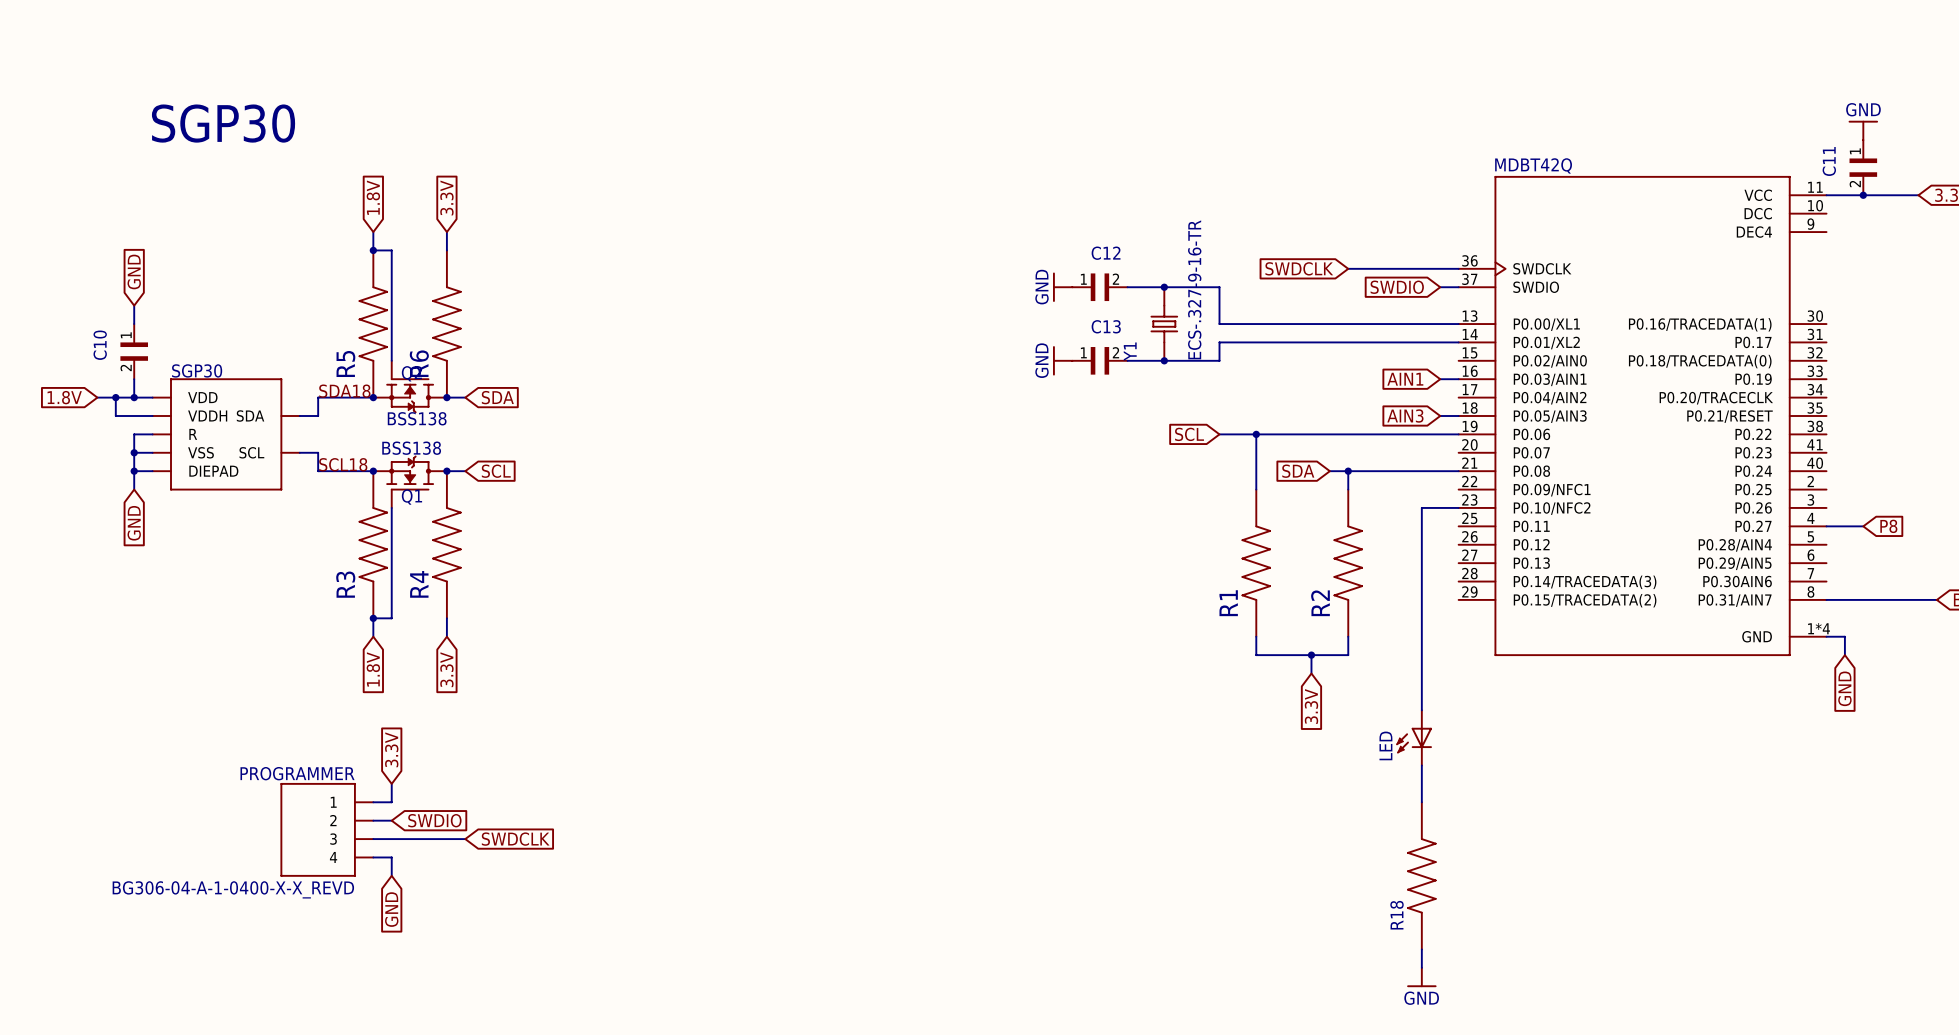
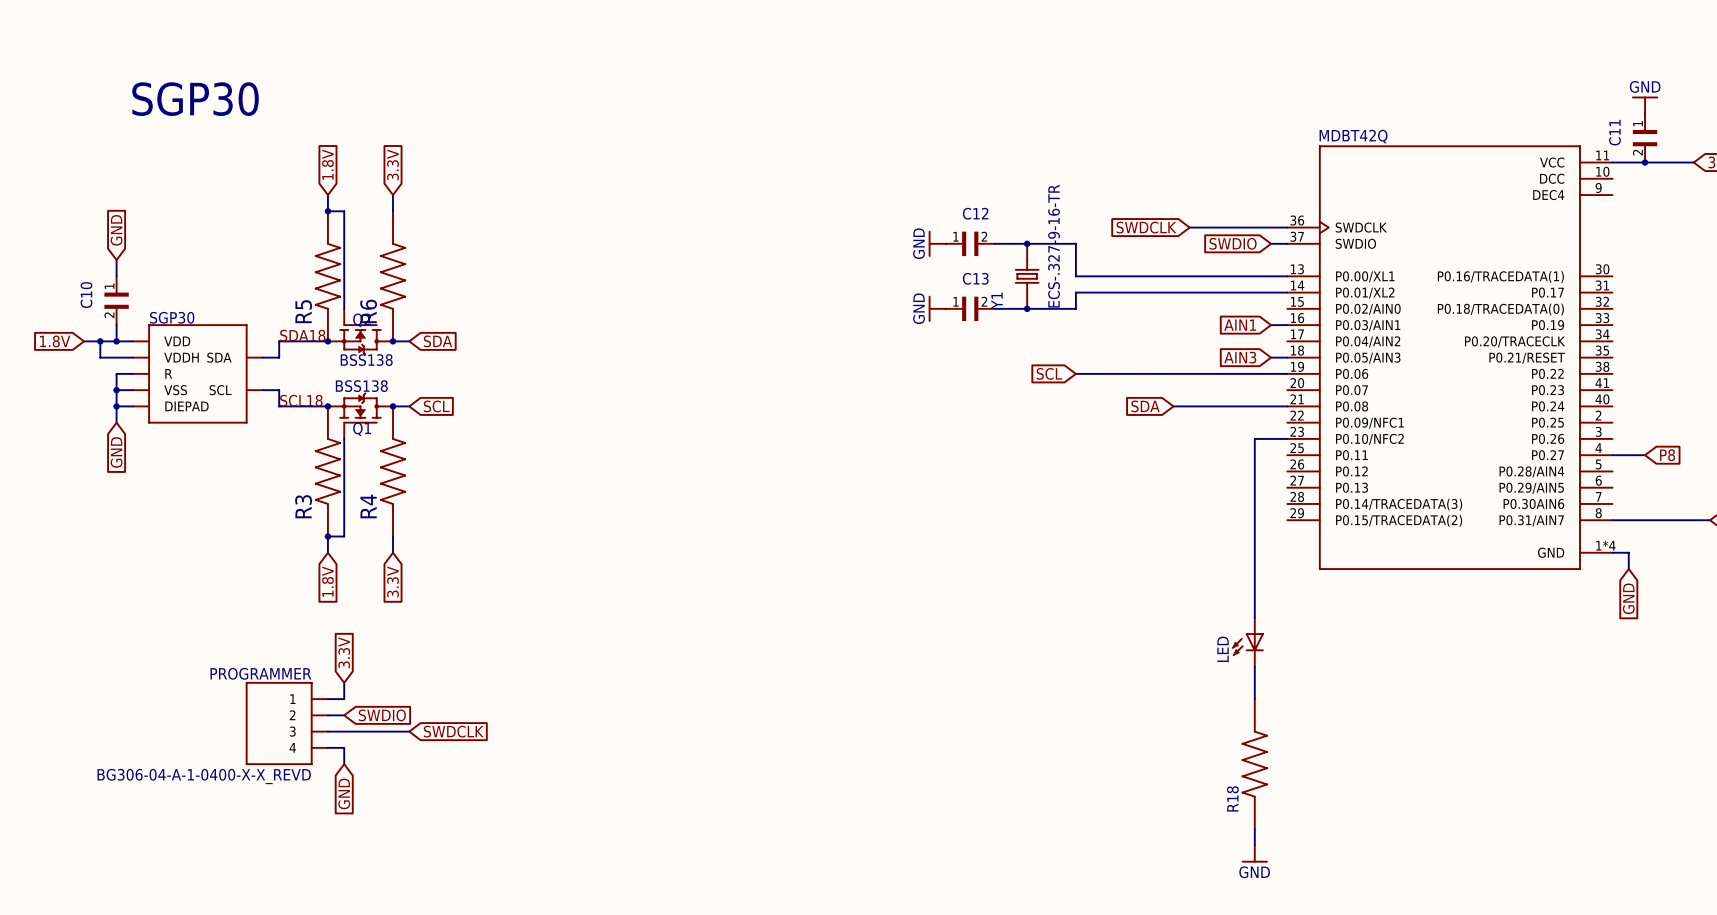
wire: (1256, 434) (1256, 489) -> none
junction: (1256, 434) -> none
wire: (1348, 471) (1348, 489) -> none
junction: (1348, 471) -> none
R1: (1256, 563) -> none
R2: (1348, 563) -> none
wire: (1256, 636) (1256, 655) (1348, 655) (1348, 636) -> none
wire: (1311, 655) (1311, 673) -> none
junction: (1311, 655) -> none
global label: 3.3V (1311, 706) -> none

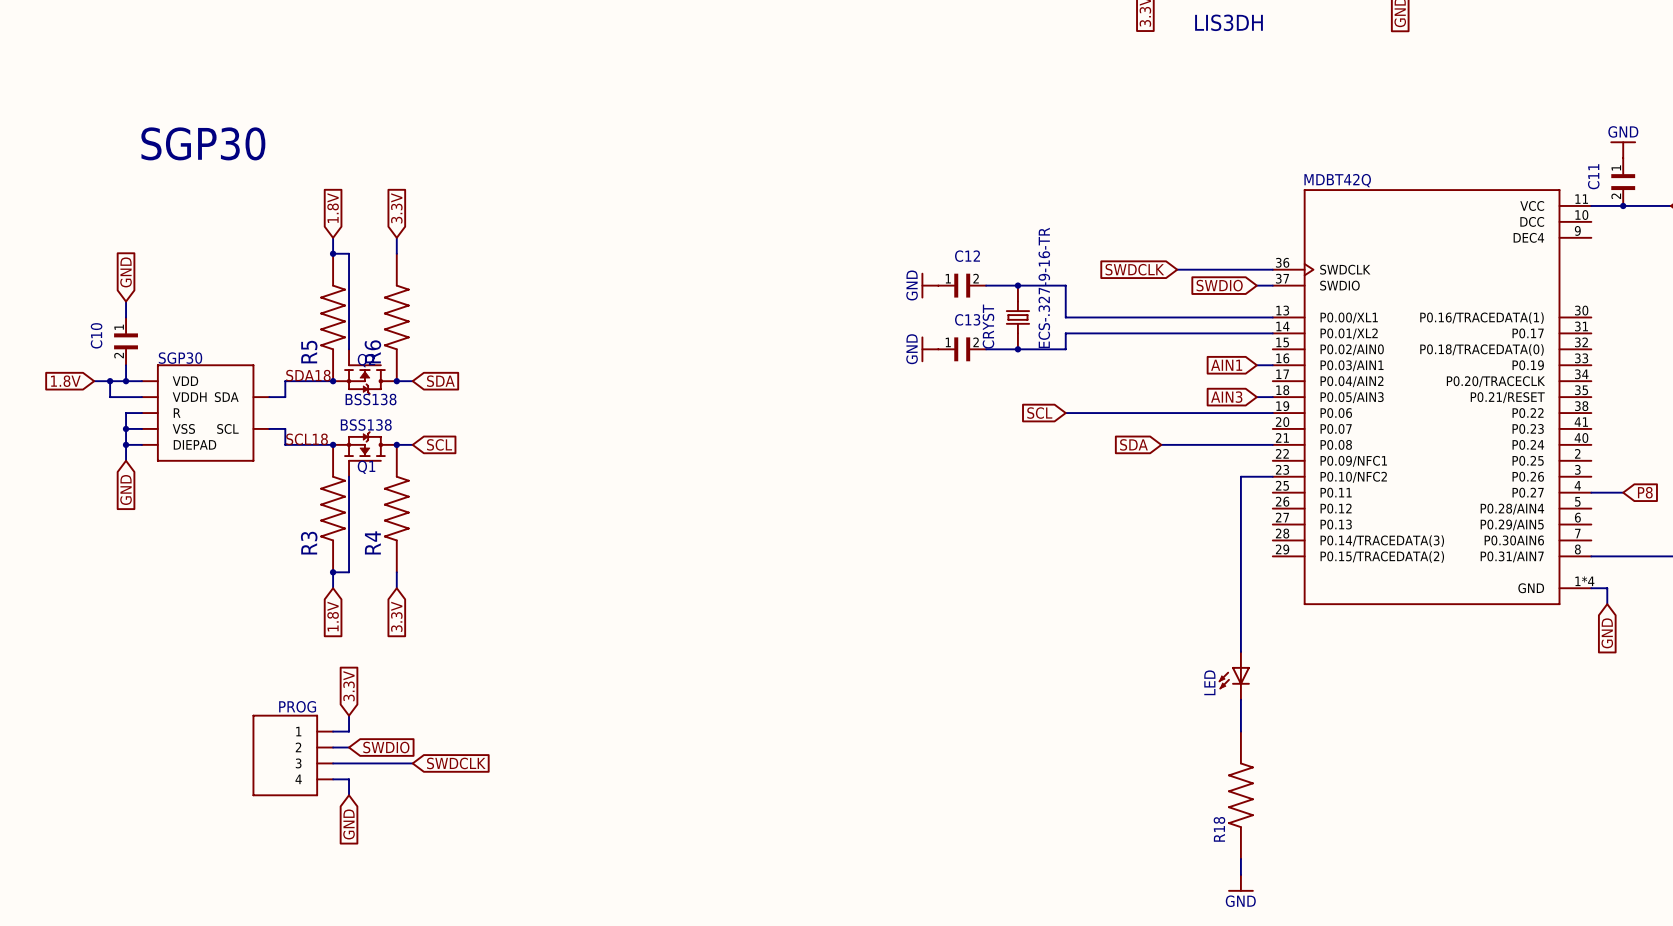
Y1 name: Y1 (997, 300) -> CRYST (988, 326)
PROGRAMMER name: PROGRAMMER (260, 673) -> PROG (297, 706)
PROGRAMMER value: BG306-04-A-1-0400-X-X_REVD (204, 776) -> none

